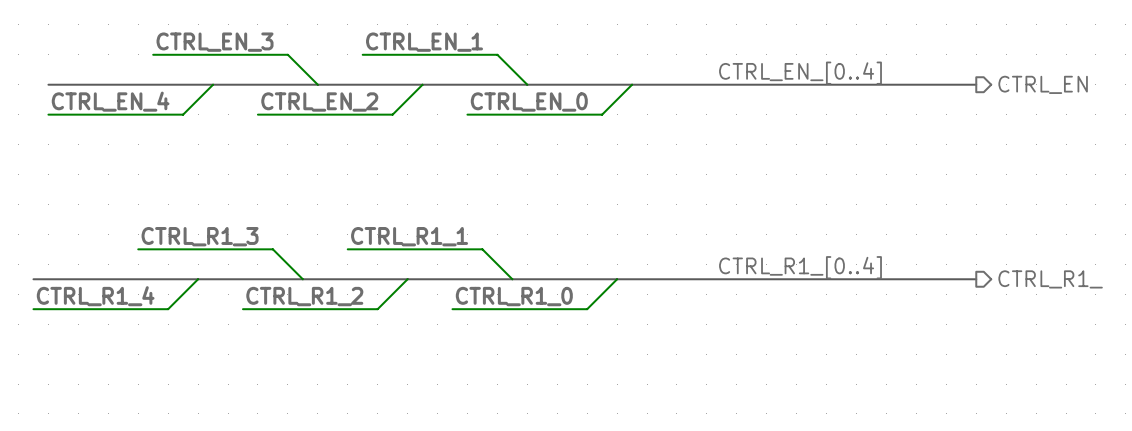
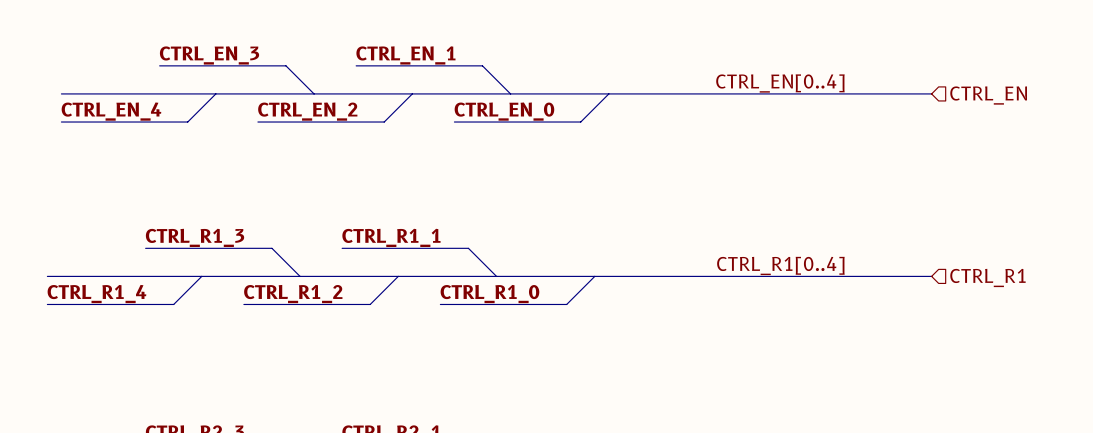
label: CTRL_EN_[0..4] (800, 73) -> CTRL_EN[0..4] (780, 83)
hierarchical label shape: output (1043, 84) -> input (988, 95)
label: CTRL_R1_[0..4] (800, 267) -> CTRL_R1[0..4] (780, 265)
hierarchical label shape: output (1050, 279) -> input (987, 277)
hierarchical label: CTRL_R1_ (1050, 279) -> CTRL_R1 (987, 277)

